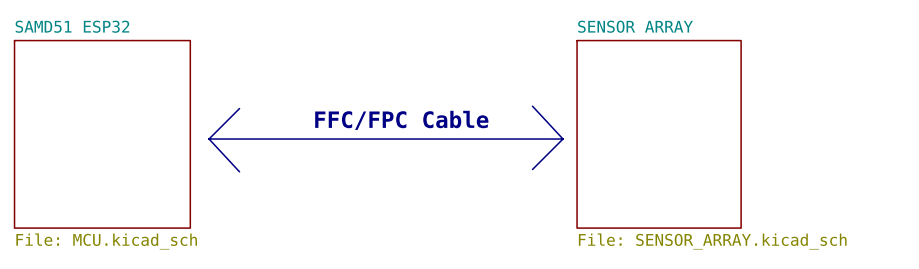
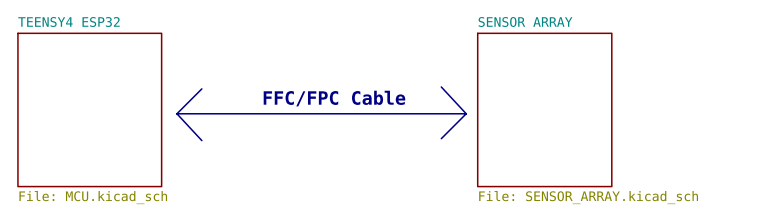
sheet SAMD51 ESP32 name: SAMD51 ESP32 (72, 26) -> TEENSY4 ESP32 (68, 22)

